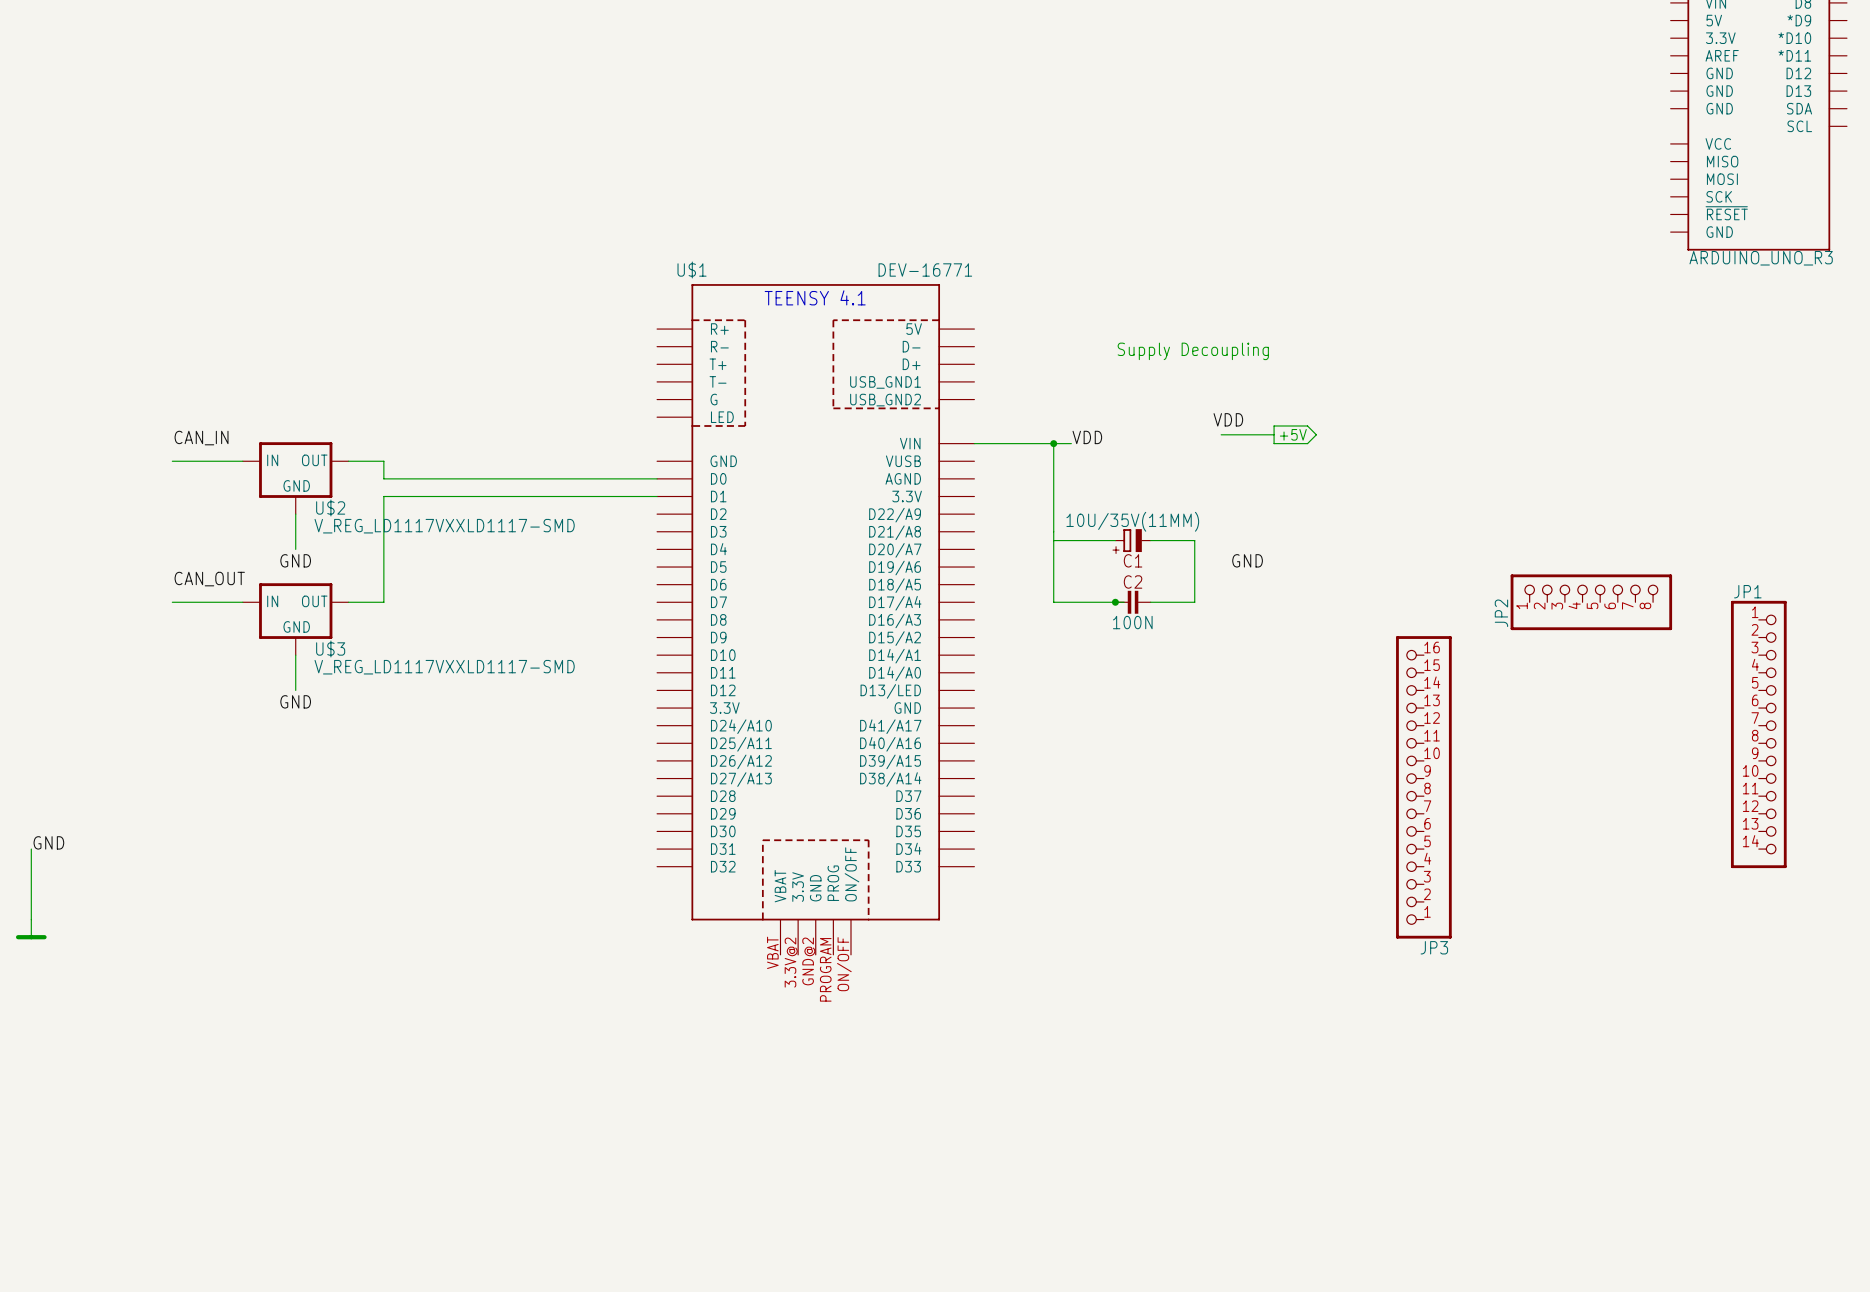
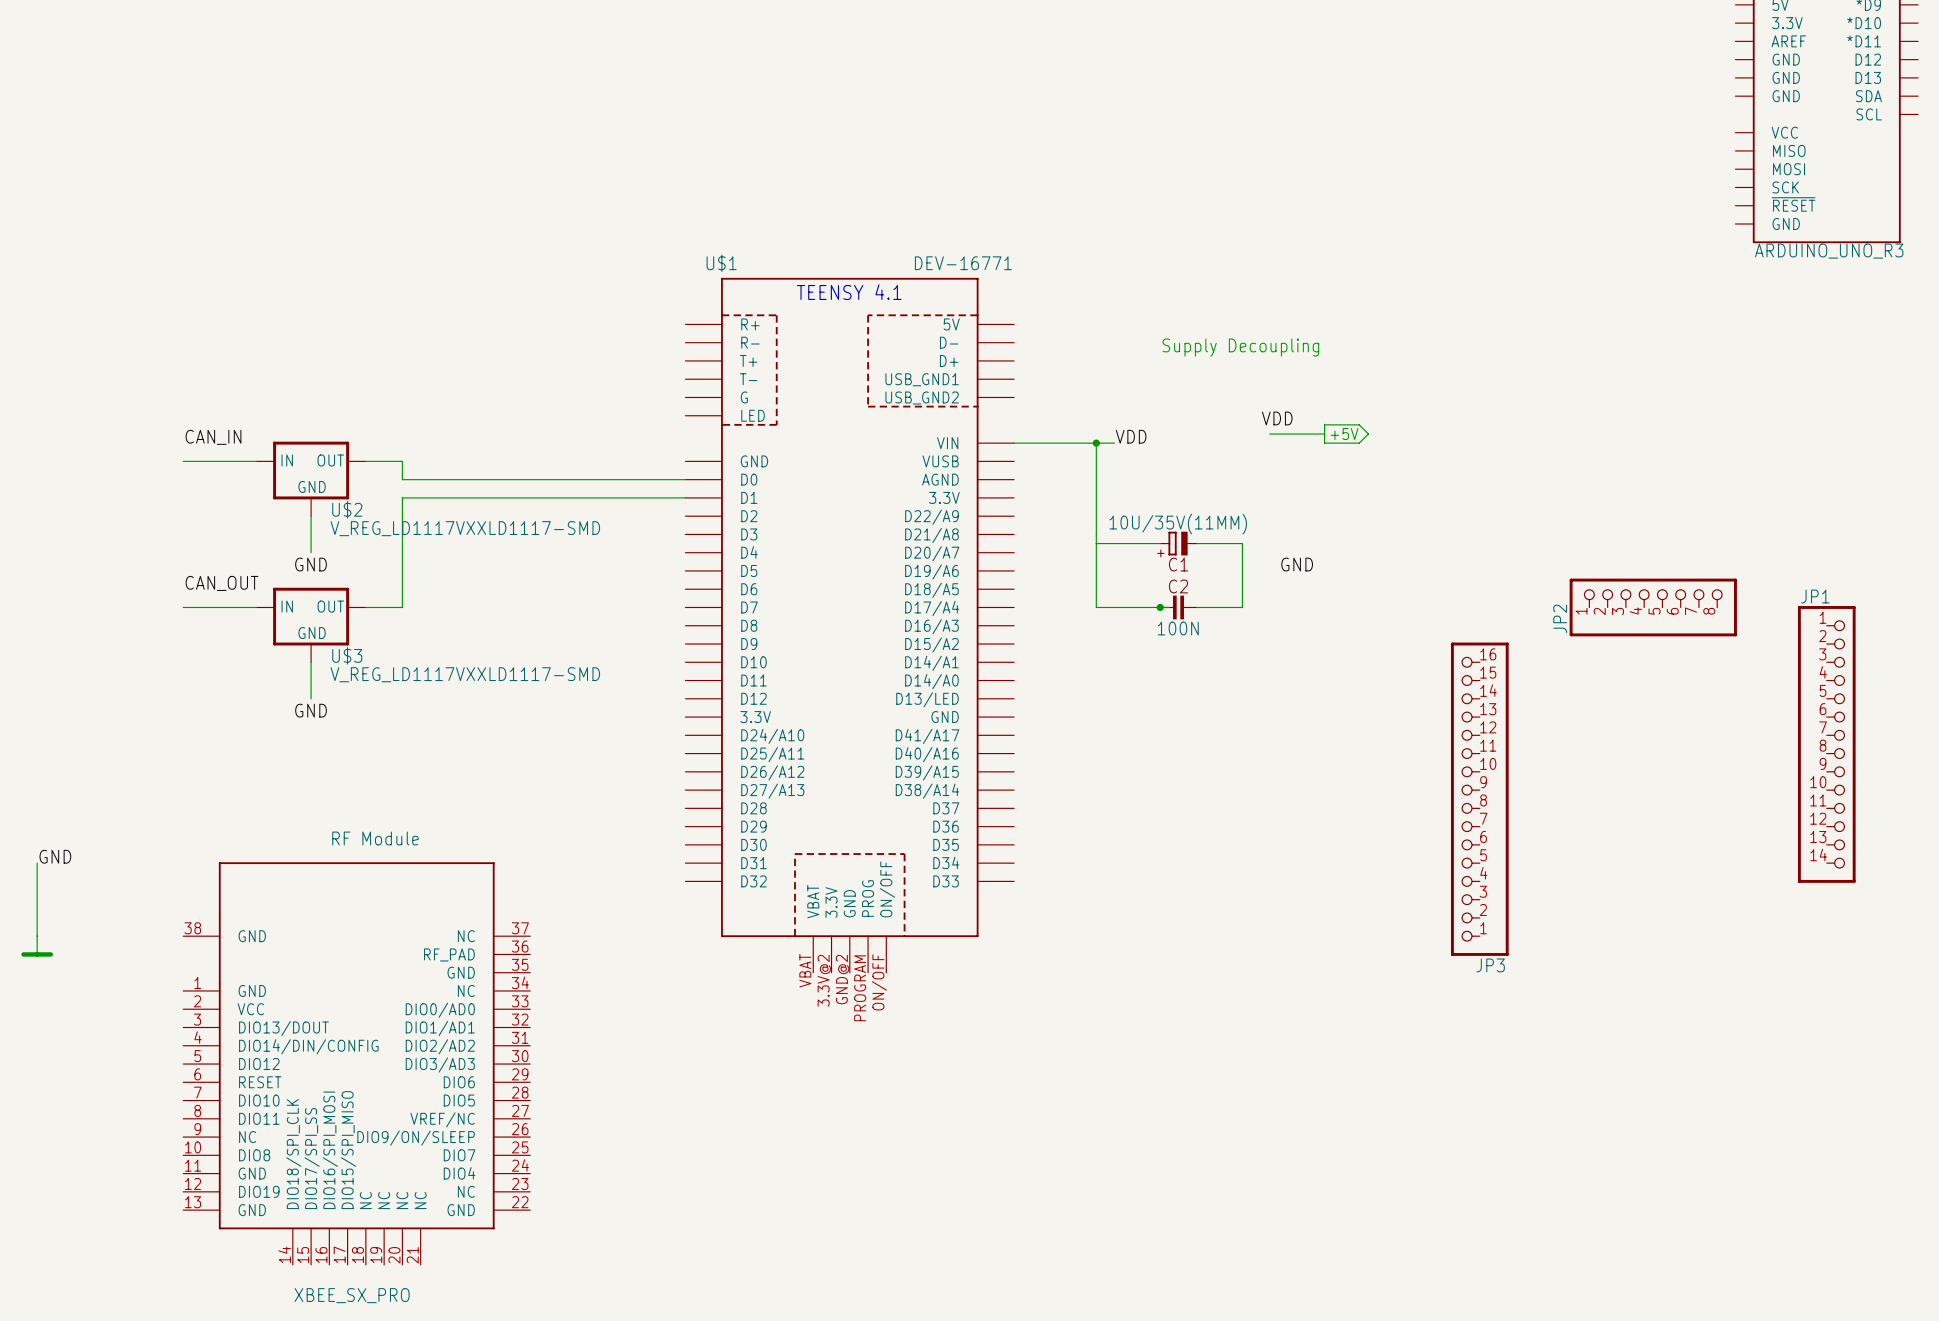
part: none -> (356, 1063)

